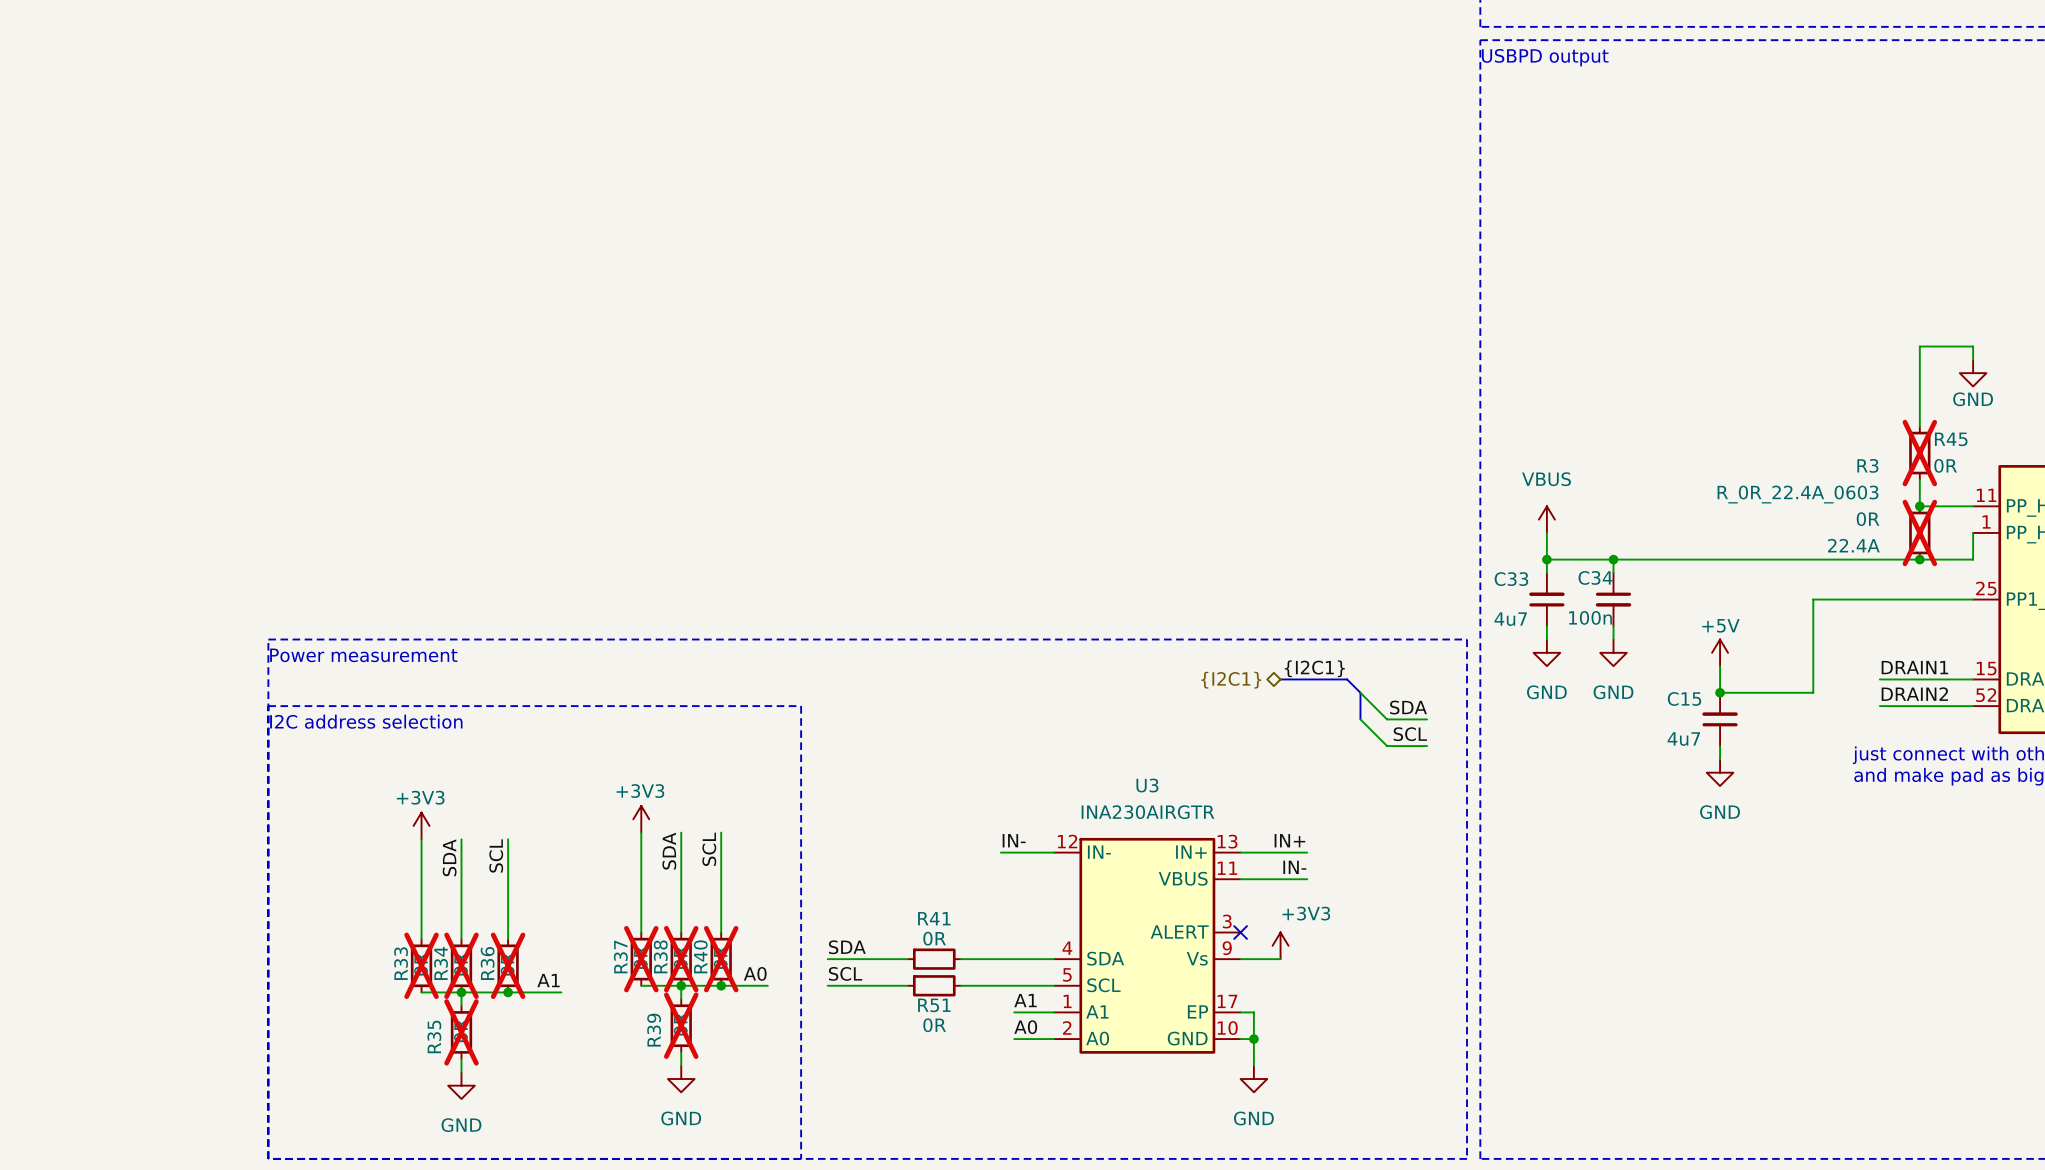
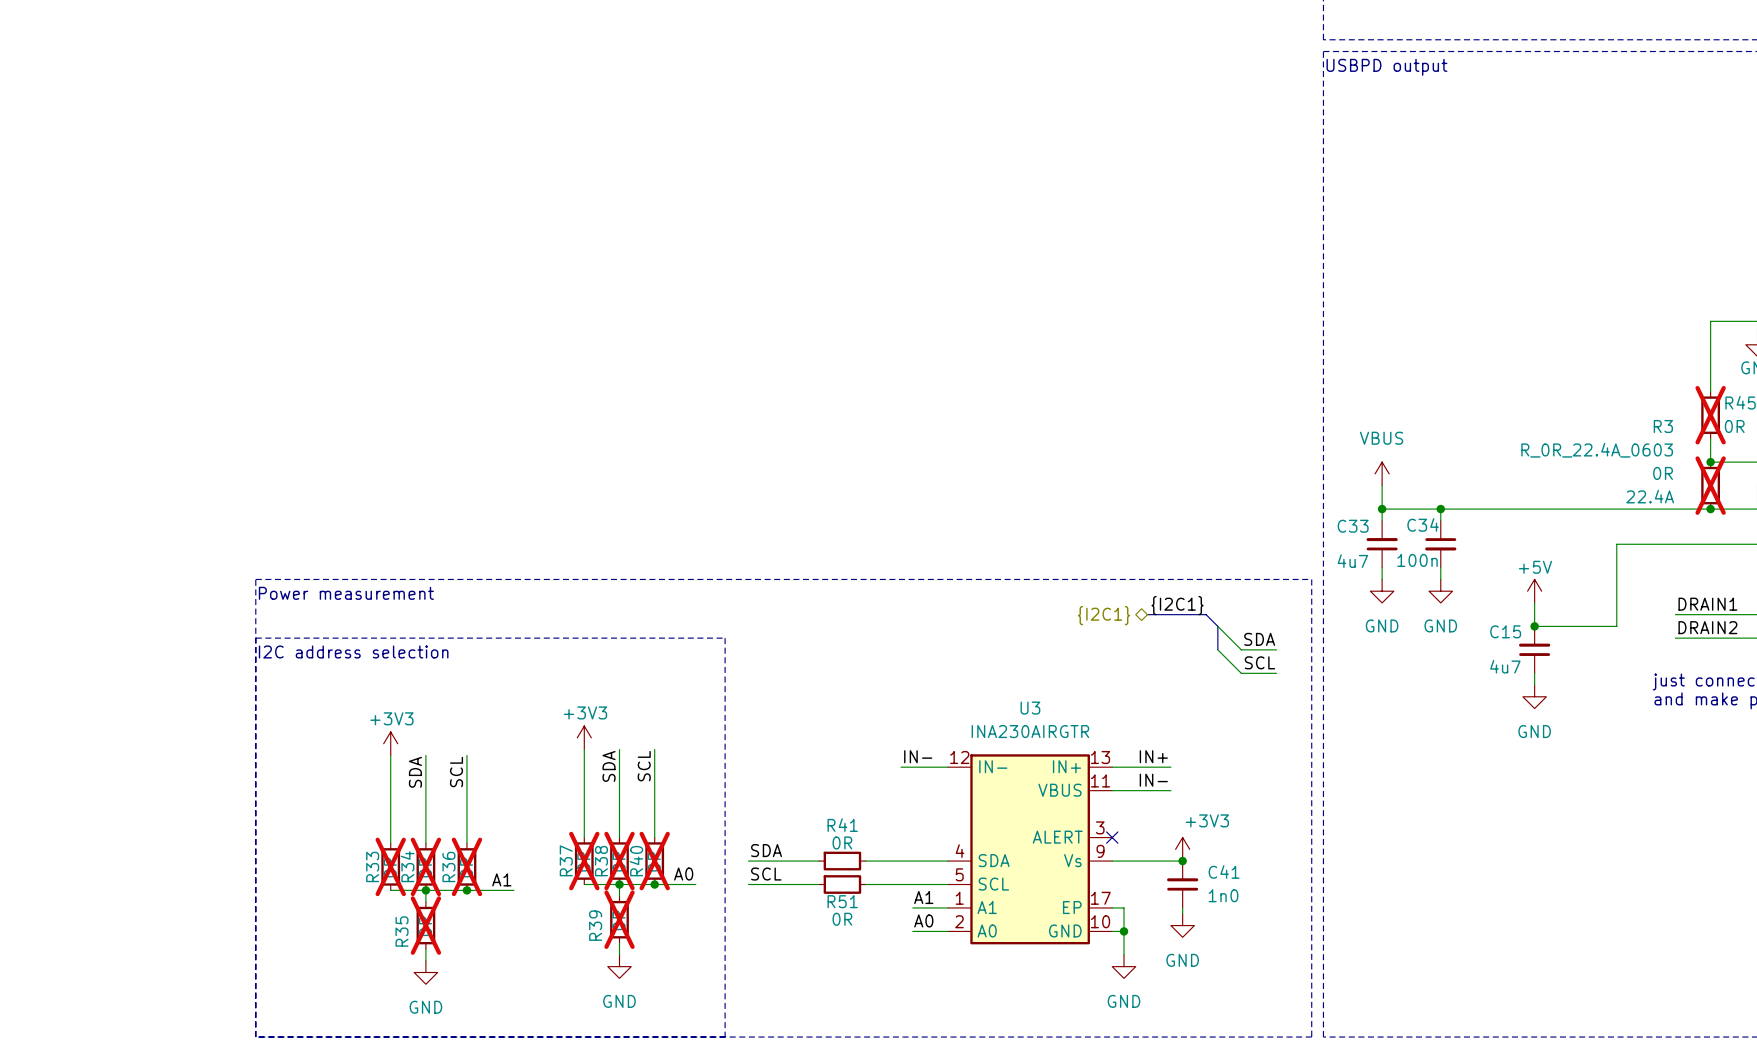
power symbol position: +3V3 (1280, 945) -> +3V3 (1182, 849)
wire: none -> (1147, 861) (1182, 861)
junction: none -> (1182, 861)
C41: none -> (1182, 884)
wire: none -> (1182, 907) (1182, 913)
power symbol: none -> GND (1182, 925)

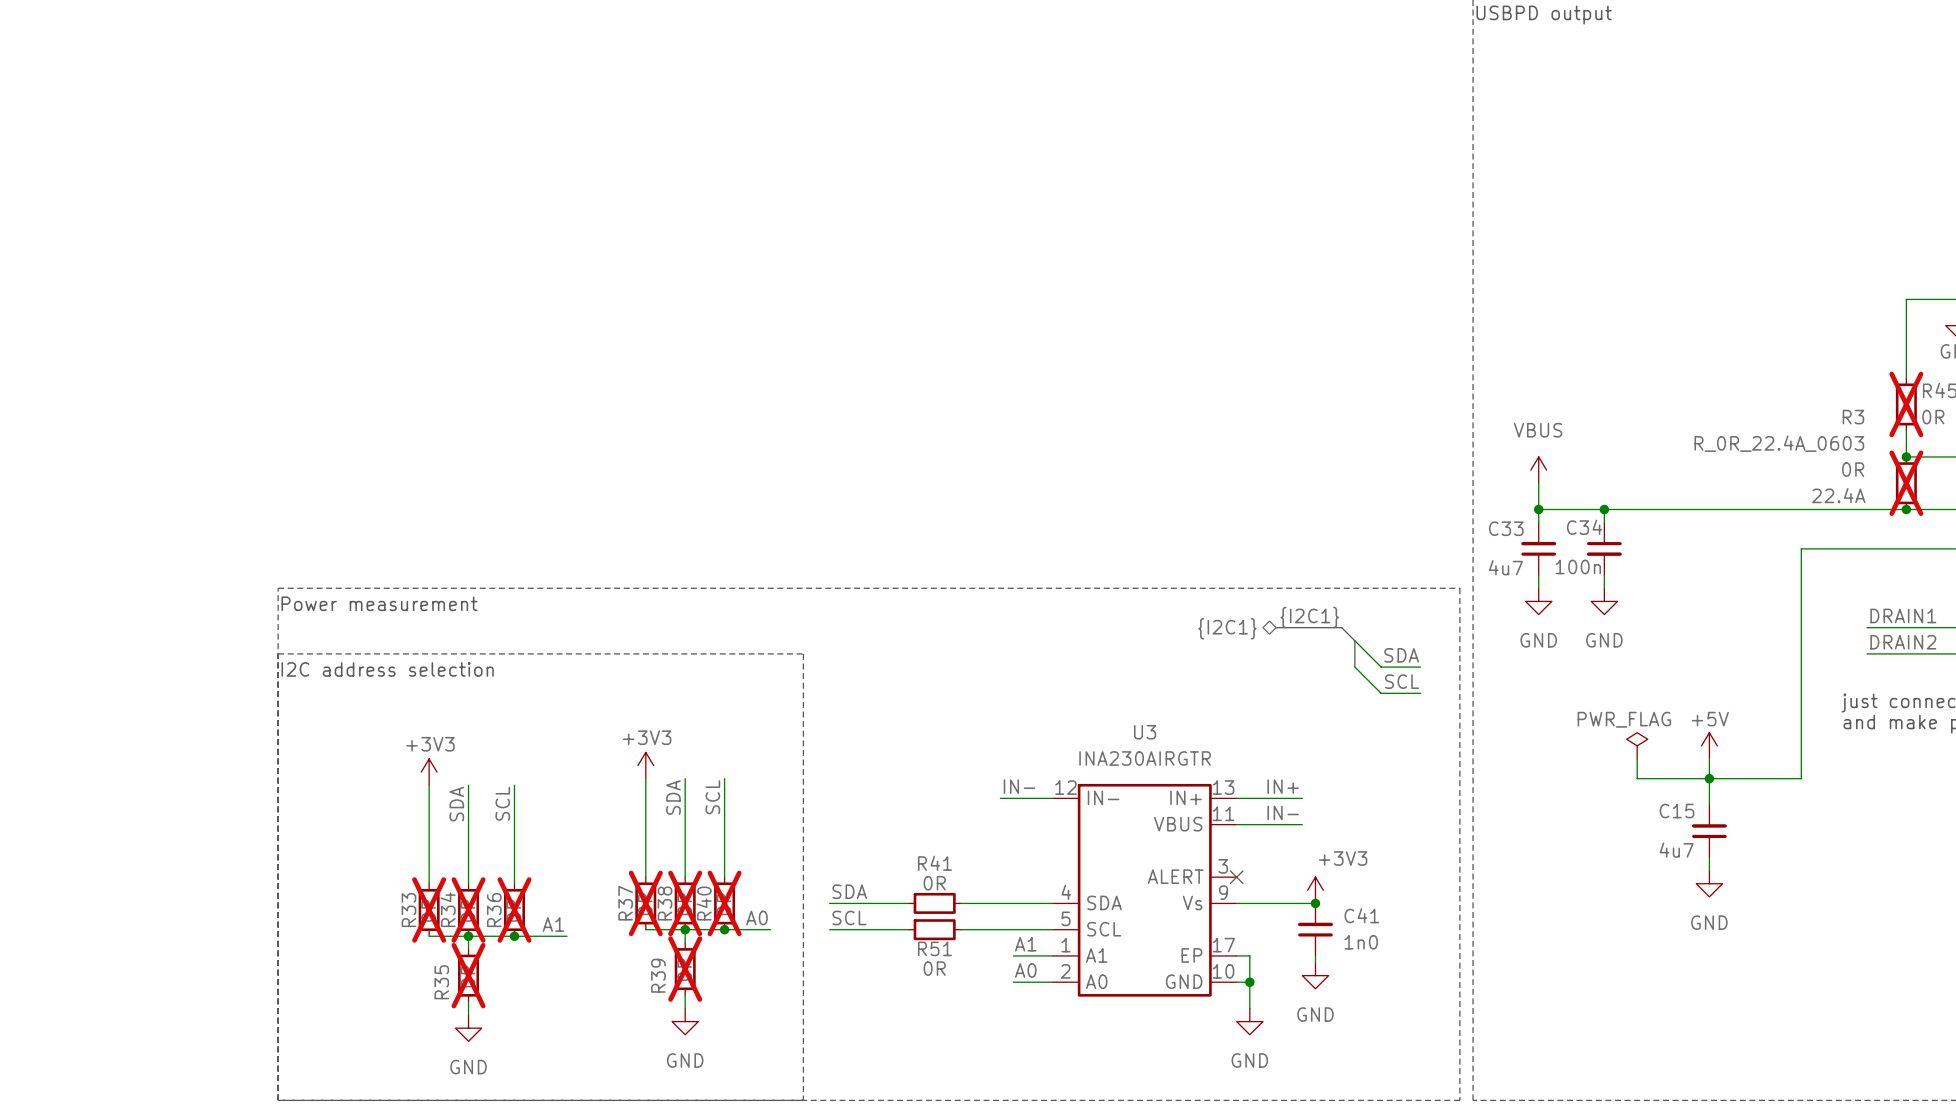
power symbol position: +5V (1534, 591) -> +5V (1709, 745)
wire: (1534, 602) (1534, 626) (1616, 626) -> (1637, 758) (1637, 778) (1801, 778) (1801, 640)
junction: (1534, 626) -> none
C15 position: (1534, 649) -> (1709, 831)
wire: (1534, 673) (1534, 685) -> (1709, 857) (1709, 870)
power symbol position: GND (1534, 696) -> GND (1709, 883)
power symbol: none -> PWR_FLAG (1637, 745)
wire: none -> (1709, 758) (1709, 804)
junction: none -> (1709, 778)

